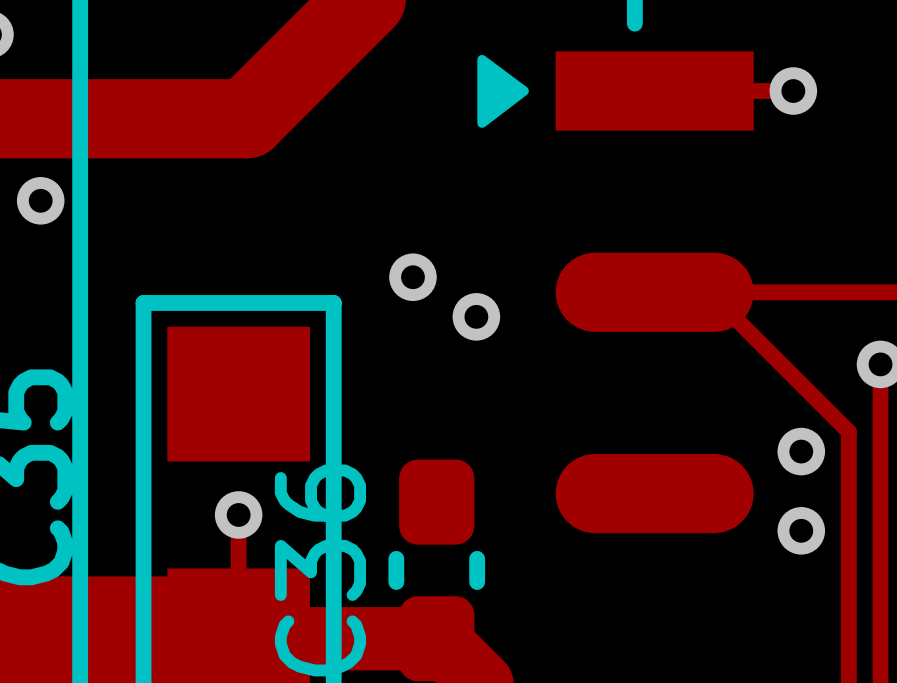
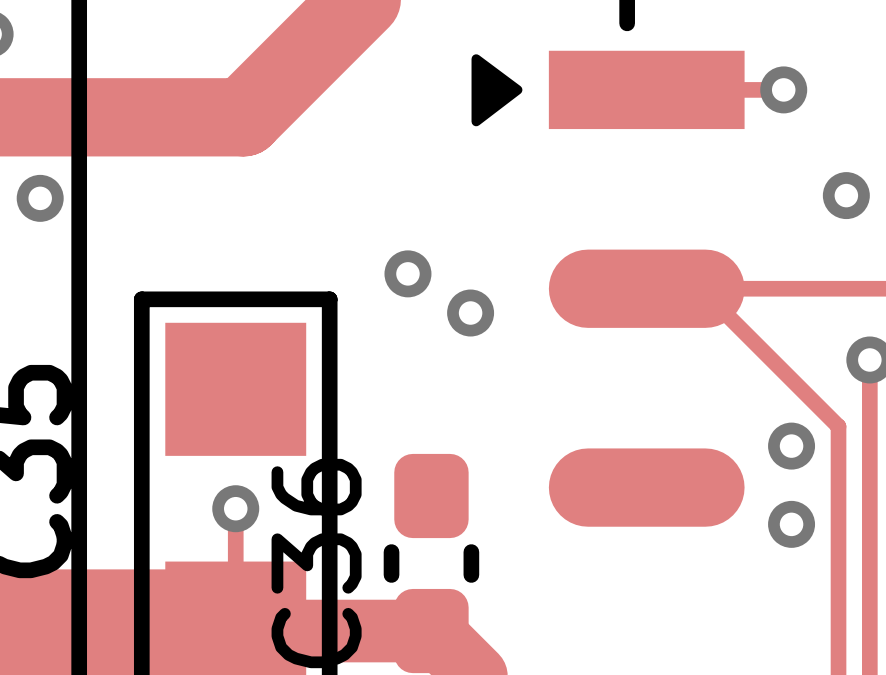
via: none -> (846, 195)

